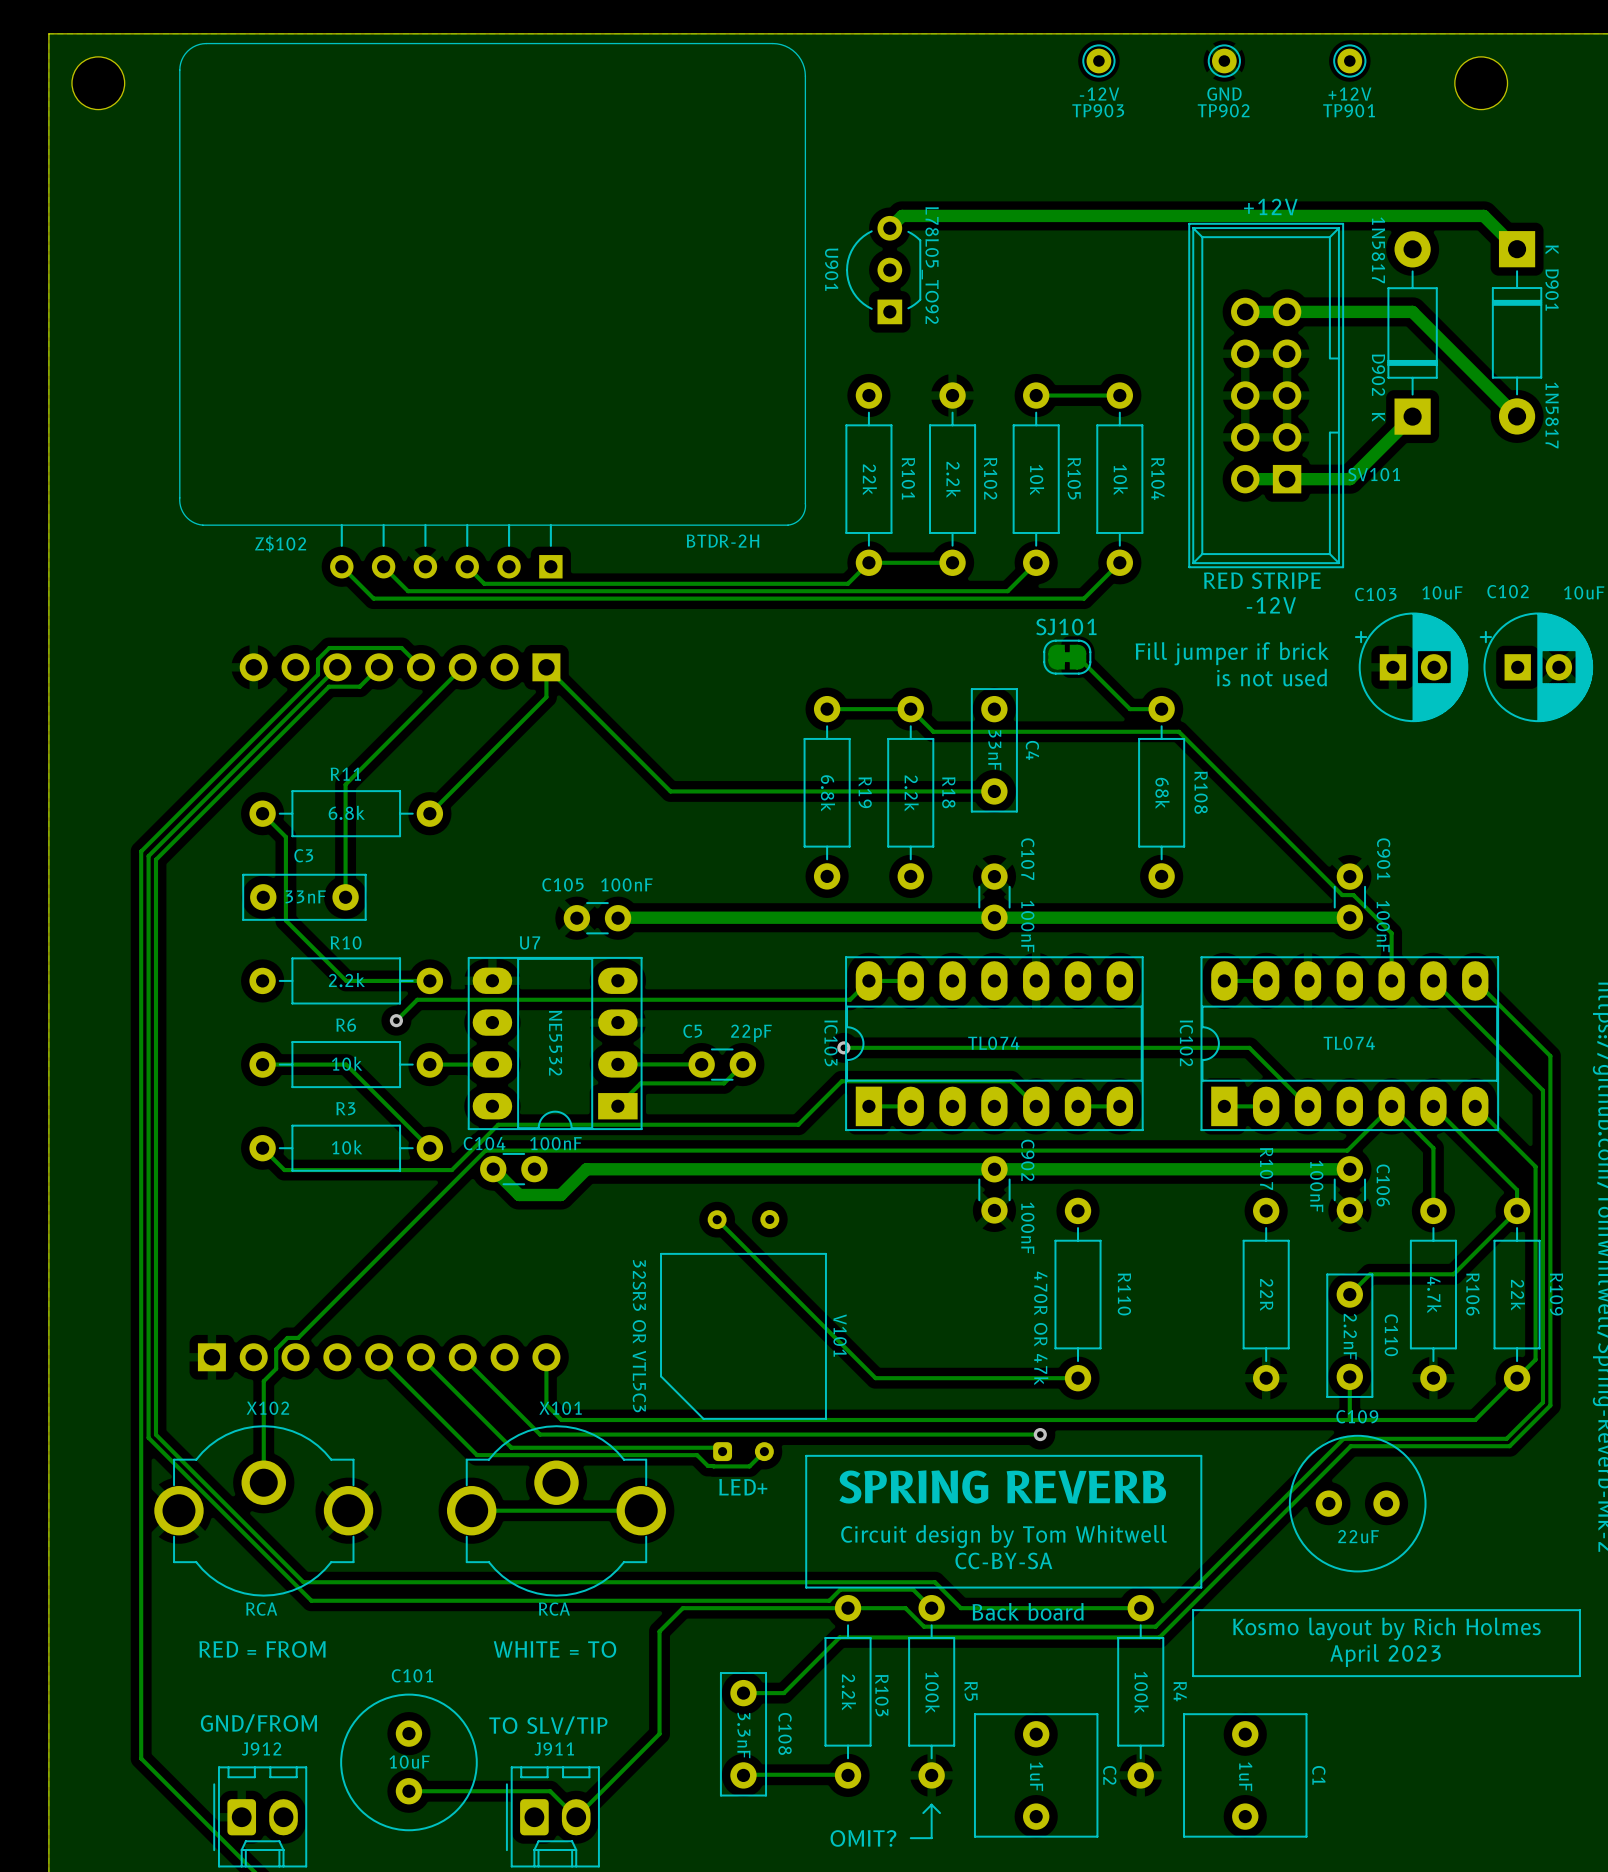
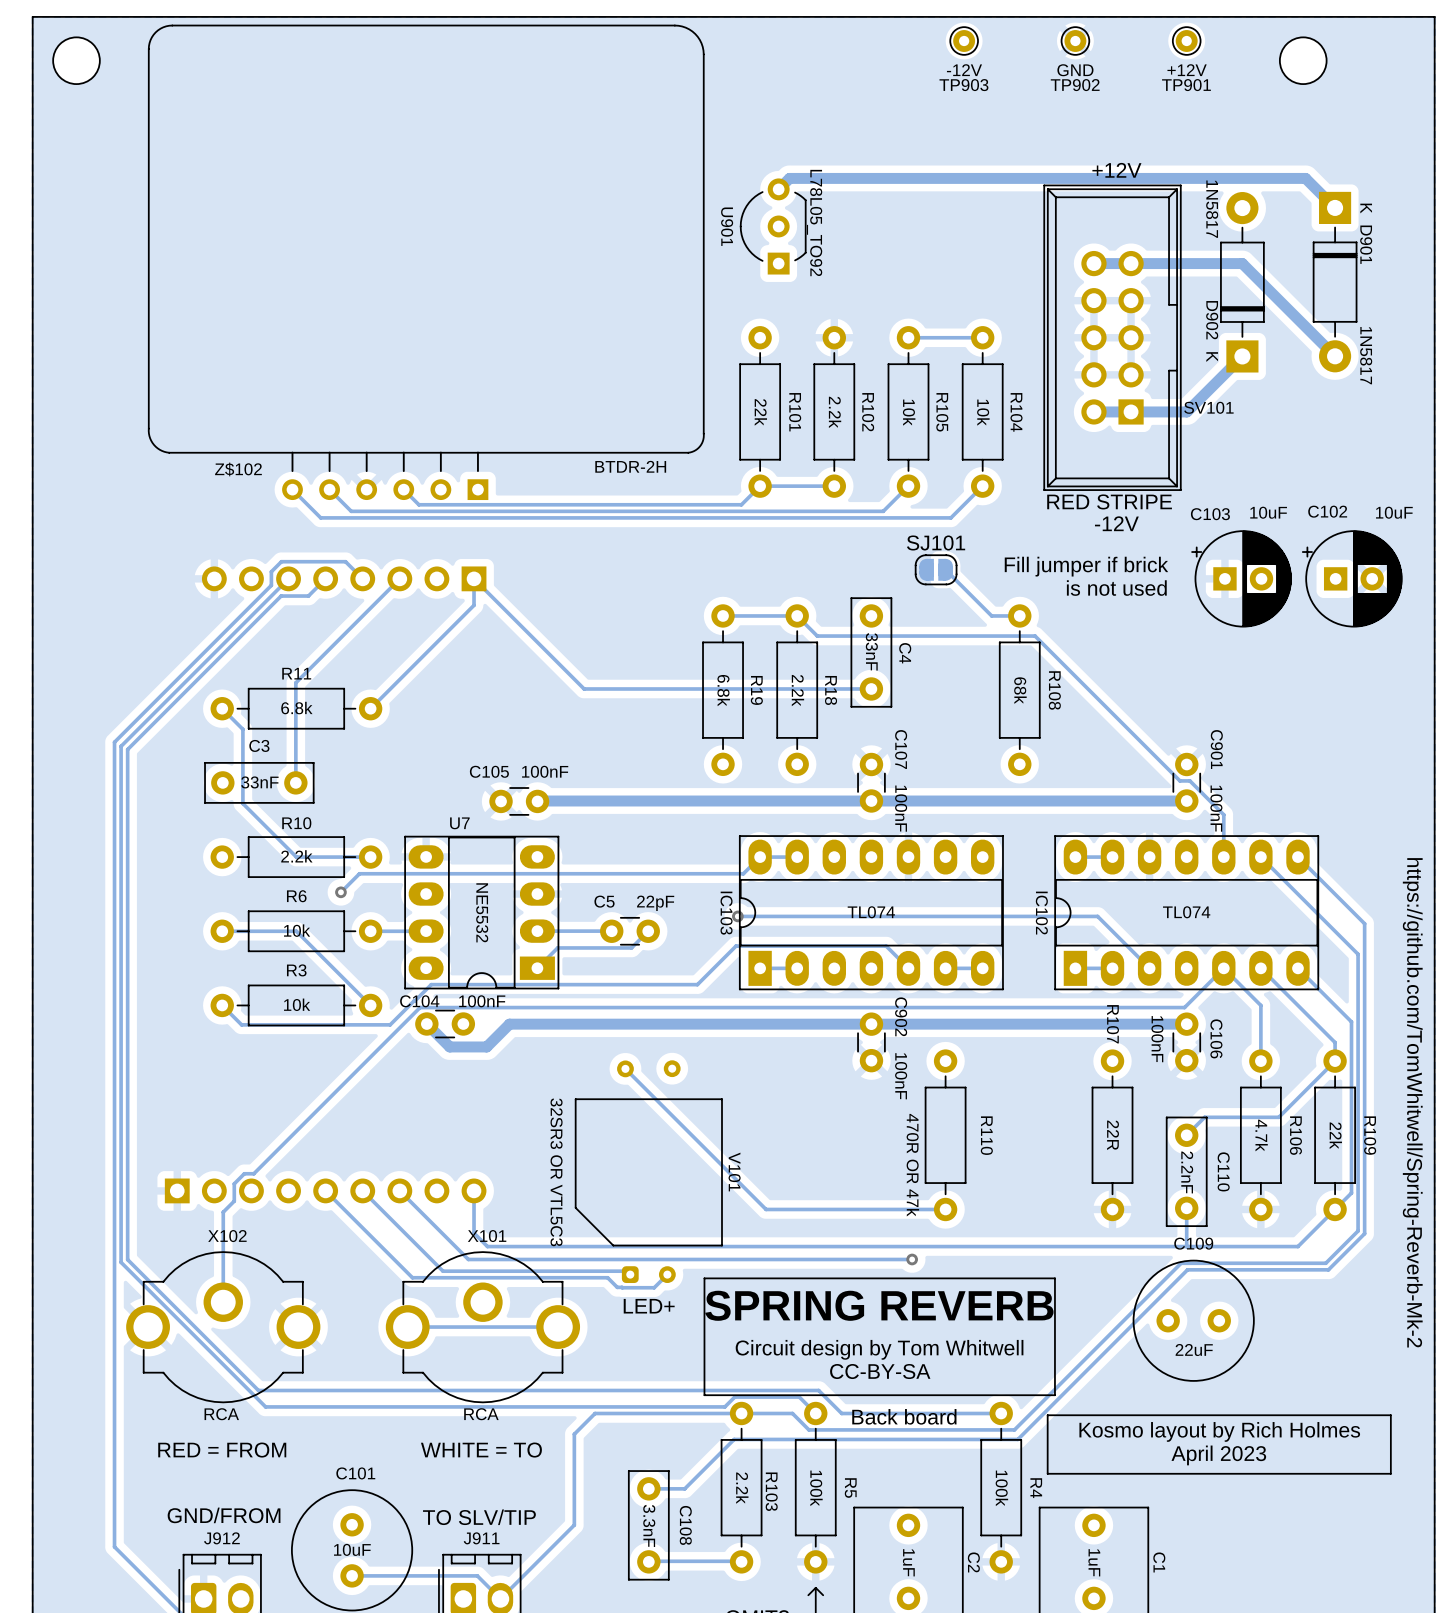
SJ101 footprint: [1043, 639, 1092, 675] -> [914, 554, 958, 586]

